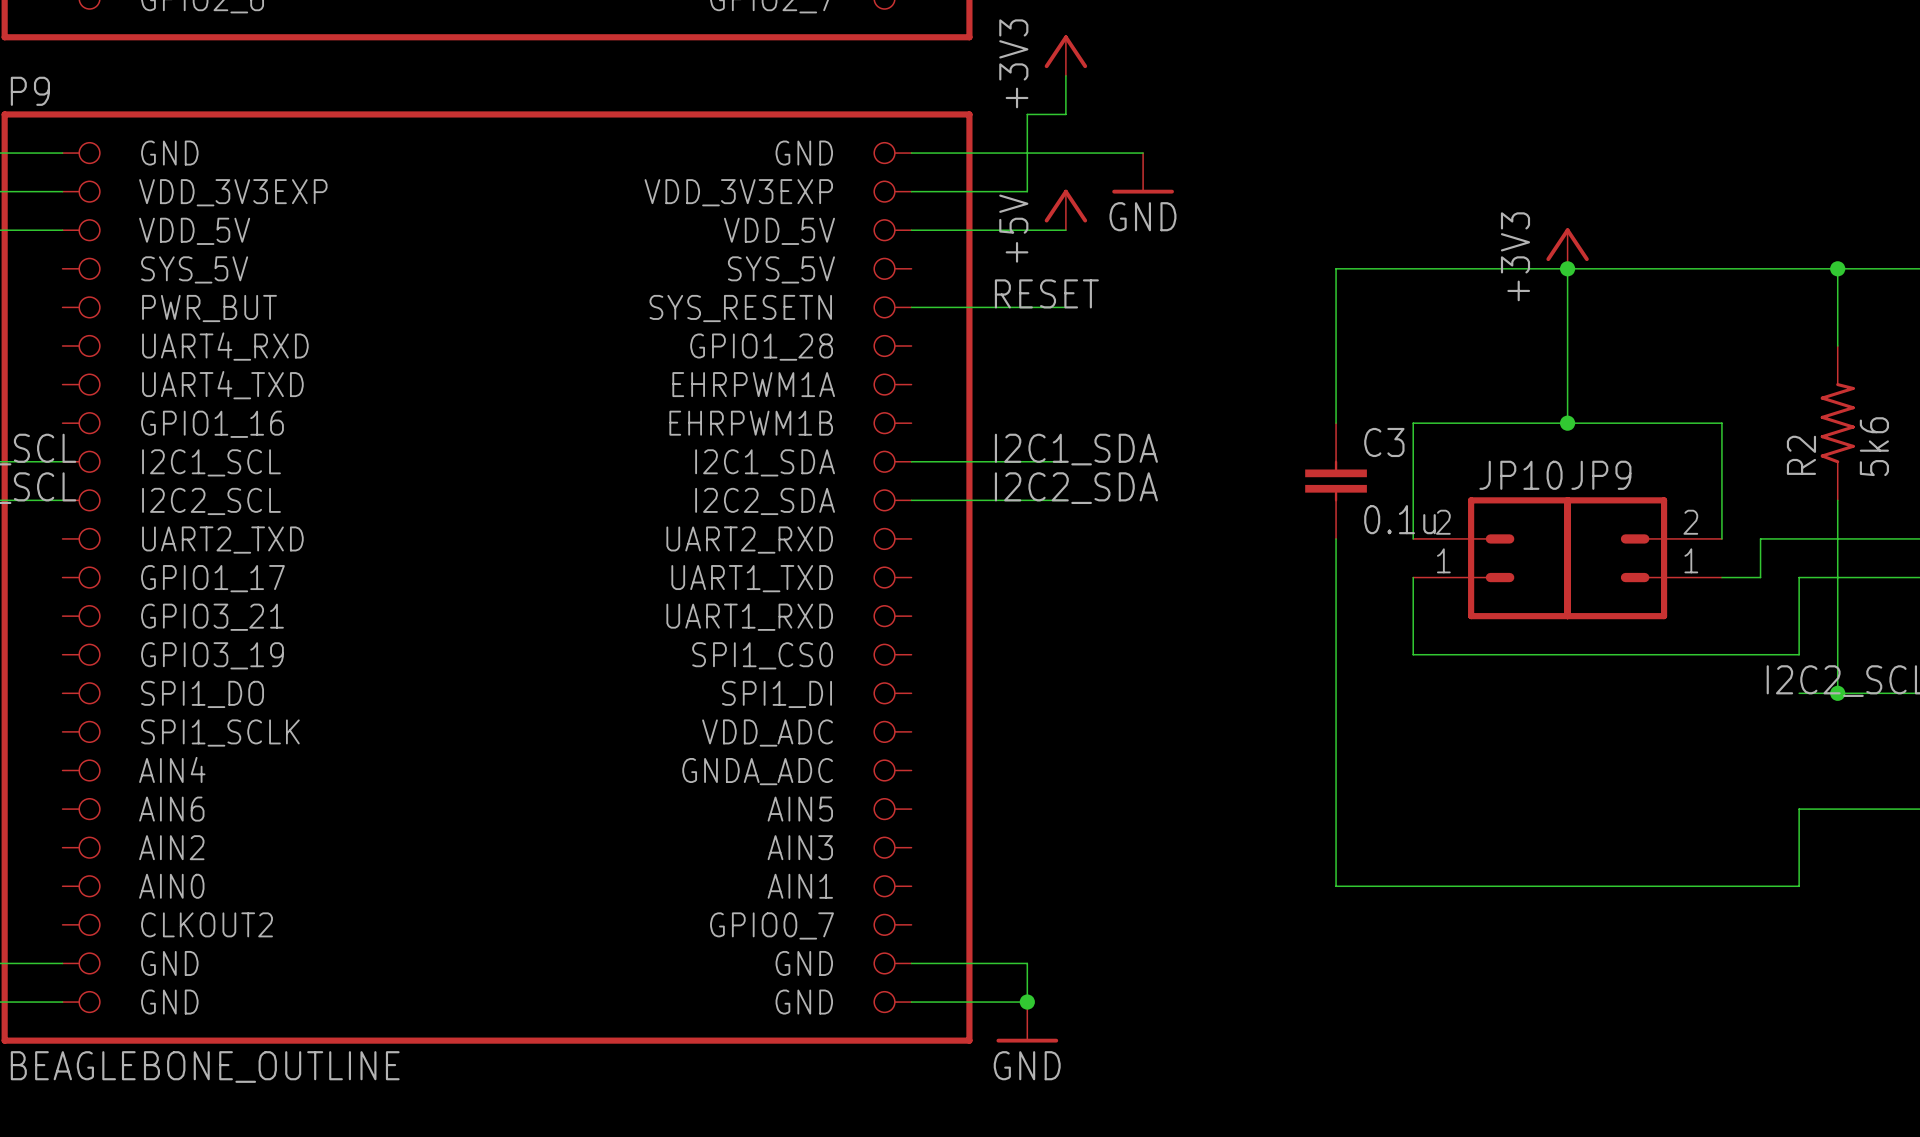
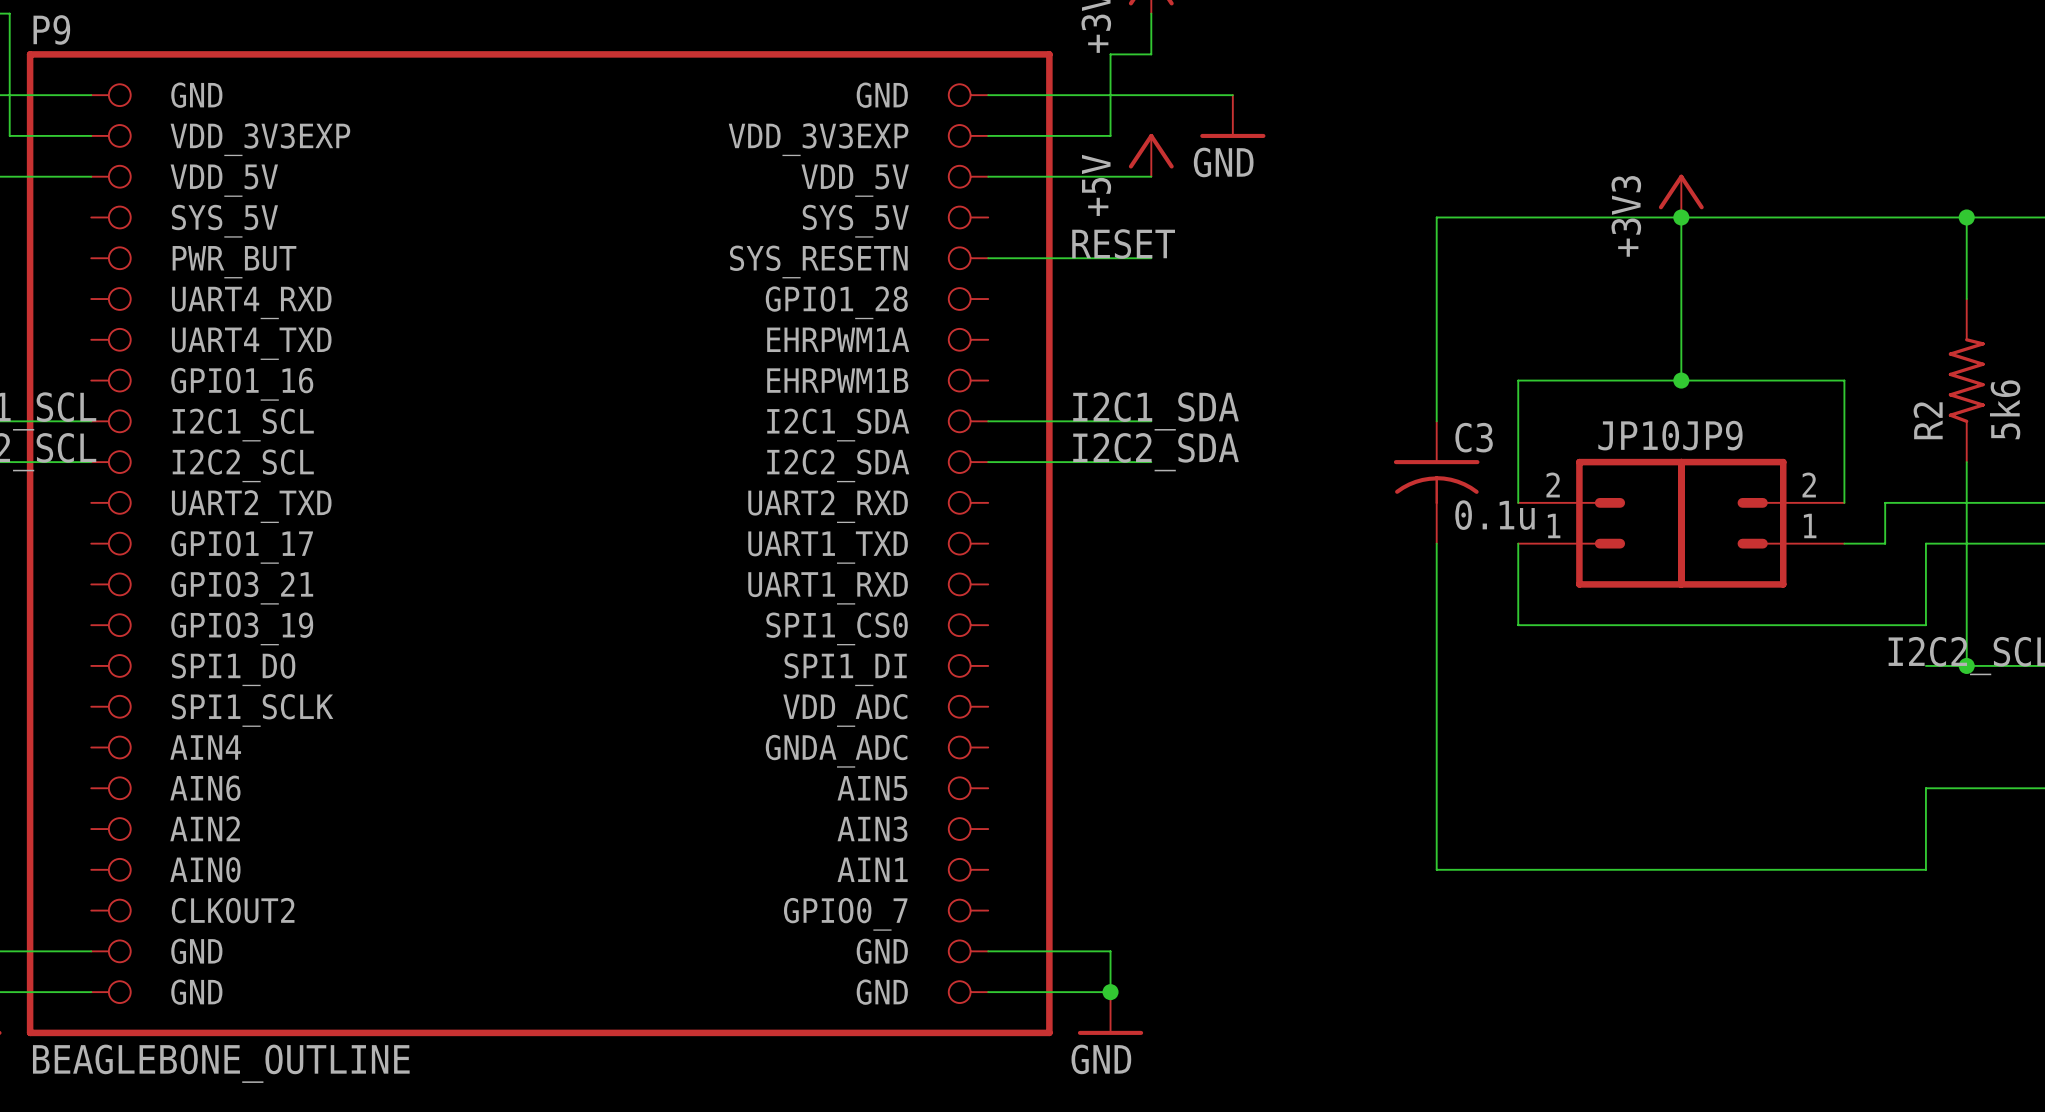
C3 symbol: [1305, 423, 1367, 539] -> [1393, 421, 1480, 544]

